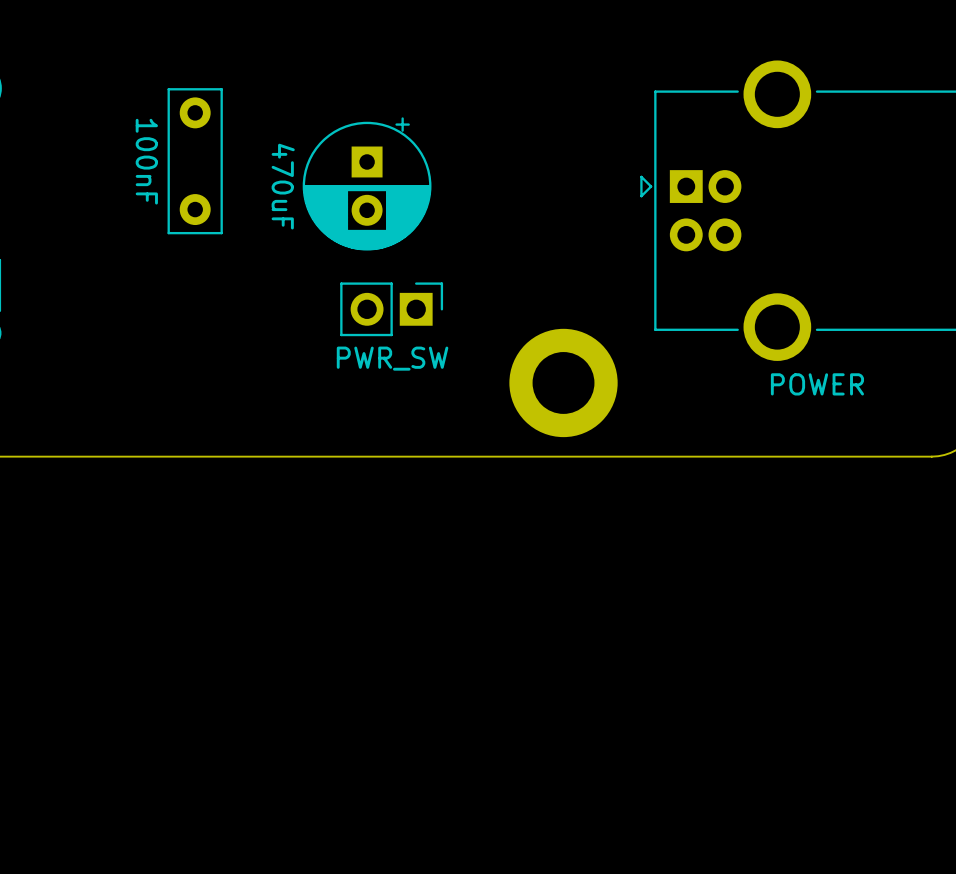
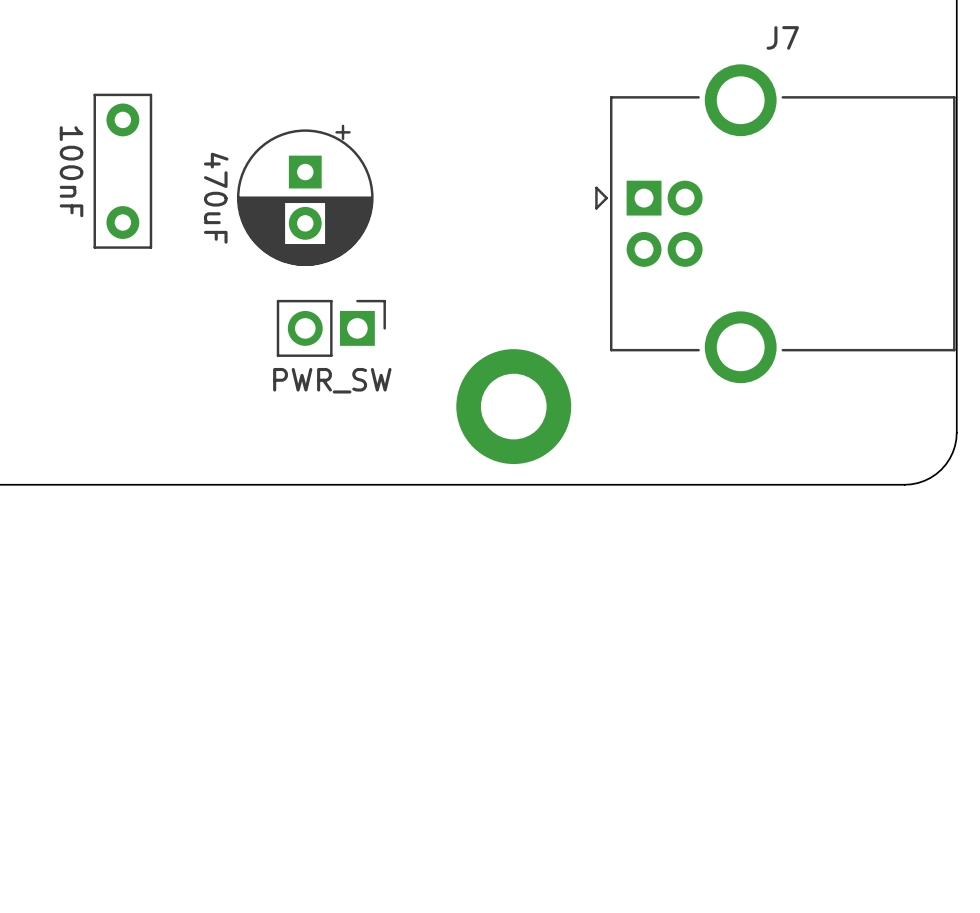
J7 name: none -> J7 (782, 37)
J7 value: POWER (817, 384) -> none

